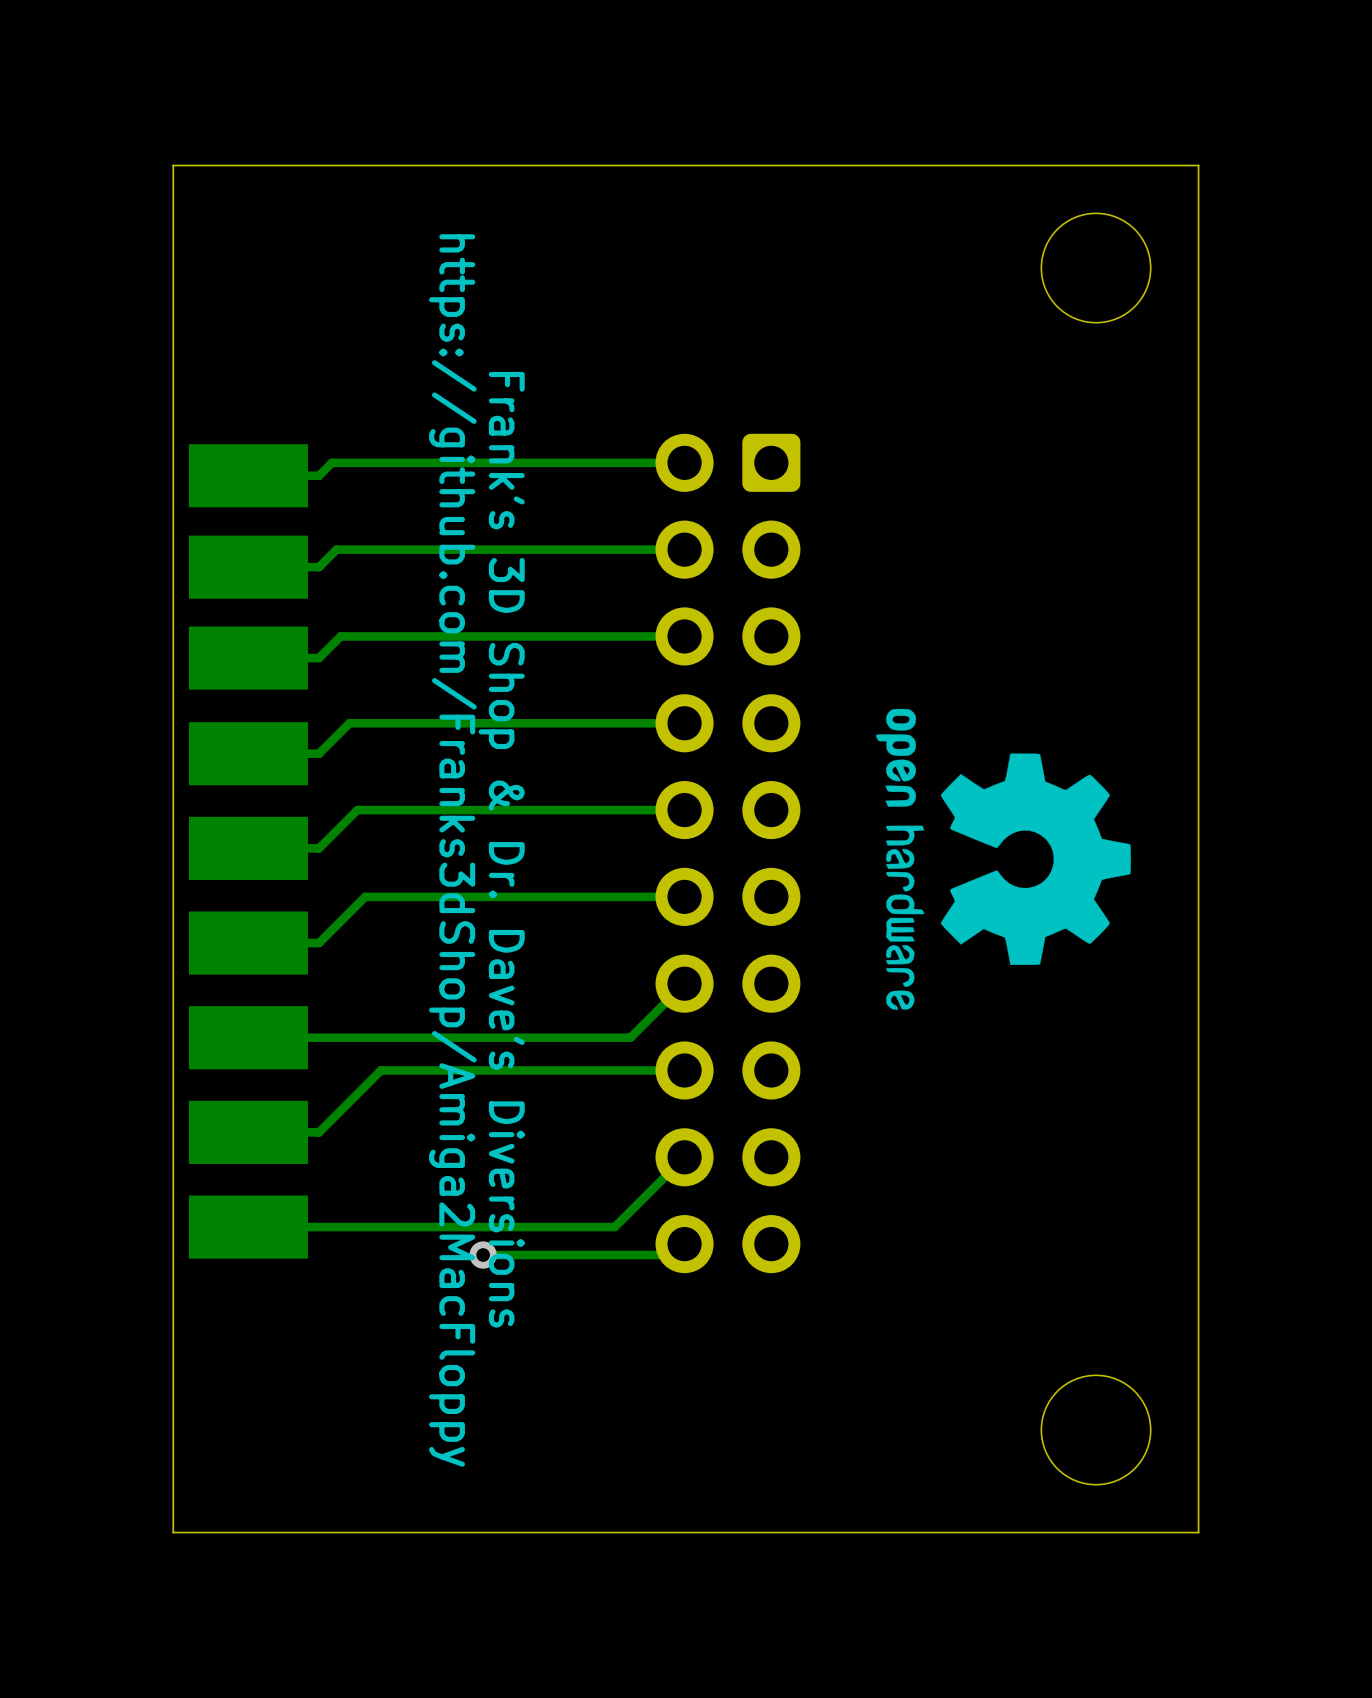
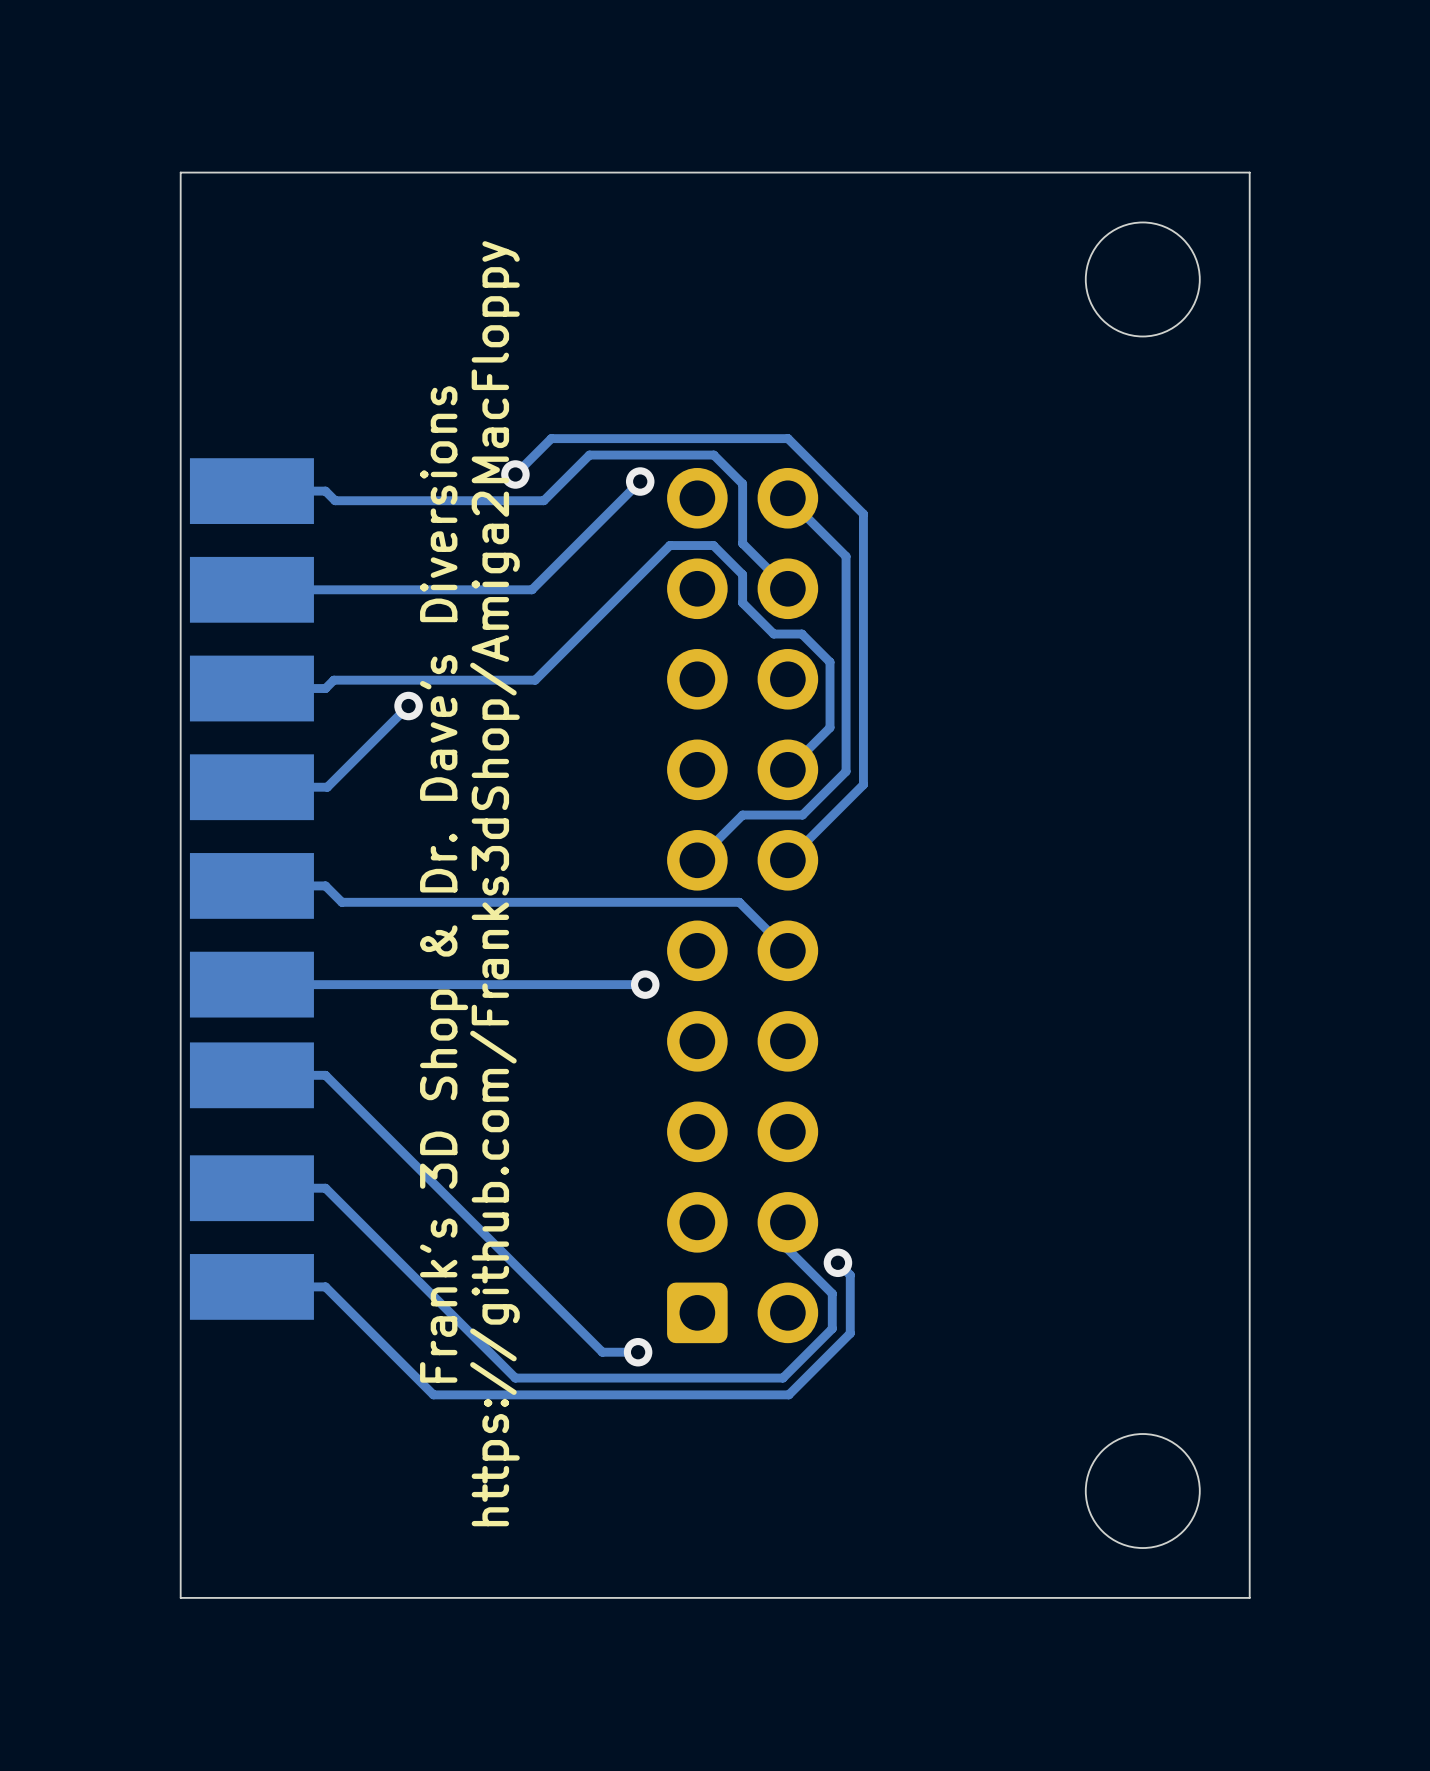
part footprint: [189, 444, 308, 1259] -> [189, 458, 314, 1320]
track: none -> (515, 474) (551, 438) (788, 438) (863, 514) (863, 784) (787, 860)
via: none -> (515, 474)
track: none -> (640, 481) (531, 589) (251, 589)
via: none -> (640, 481)
track: (684, 462) (331, 462) (319, 475) (248, 475) -> none
track: none -> (251, 491) (325, 491) (335, 500) (543, 500) (589, 455) (713, 455) (742, 483) (742, 543) (787, 588)
track: none -> (787, 498) (846, 556) (846, 771) (802, 815) (742, 815) (697, 860)
track: (684, 549) (336, 549) (319, 567) (248, 567) -> none
track: (684, 636) (340, 636) (319, 658) (248, 658) -> none
track: none -> (251, 688) (325, 688) (333, 680) (535, 680) (669, 545) (713, 545) (742, 574) (742, 602) (773, 634) (801, 634) (830, 662) (830, 727) (787, 769)
track: none -> (408, 706) (327, 787) (251, 787)
via: none -> (408, 706)
drawing: [876, 708, 1131, 1010] -> none
track: (684, 723) (349, 723) (319, 753) (248, 753) -> none
track: (684, 810) (357, 810) (319, 848) (248, 848) -> none
track: none -> (251, 885) (325, 885) (341, 902) (739, 902) (787, 950)
text rotation: 0° (501, 849) -> 180° (444, 884)
text rotation: 0° (452, 850) -> 180° (494, 883)
part rotation: 0° (727, 853) -> 180° (742, 905)
track: (684, 896) (365, 896) (319, 943) (248, 943) -> none
track: none -> (645, 984) (251, 984)
via: none -> (645, 984)
track: (684, 983) (630, 1037) (248, 1037) -> none
track: none -> (251, 1075) (325, 1075) (602, 1352) (638, 1352)
track: (684, 1070) (380, 1070) (319, 1132) (248, 1132) -> none
track: none -> (251, 1188) (325, 1188) (515, 1378) (782, 1378) (832, 1328) (832, 1293) (787, 1249) (787, 1222)
track: (684, 1157) (614, 1227) (248, 1227) -> none
track: none -> (837, 1262) (850, 1275) (850, 1333) (788, 1394) (433, 1394) (325, 1286) (251, 1286)
via: none -> (837, 1262)
track: (684, 1244) (673, 1255) (483, 1255) -> none
via position: (483, 1255) -> (638, 1352)

